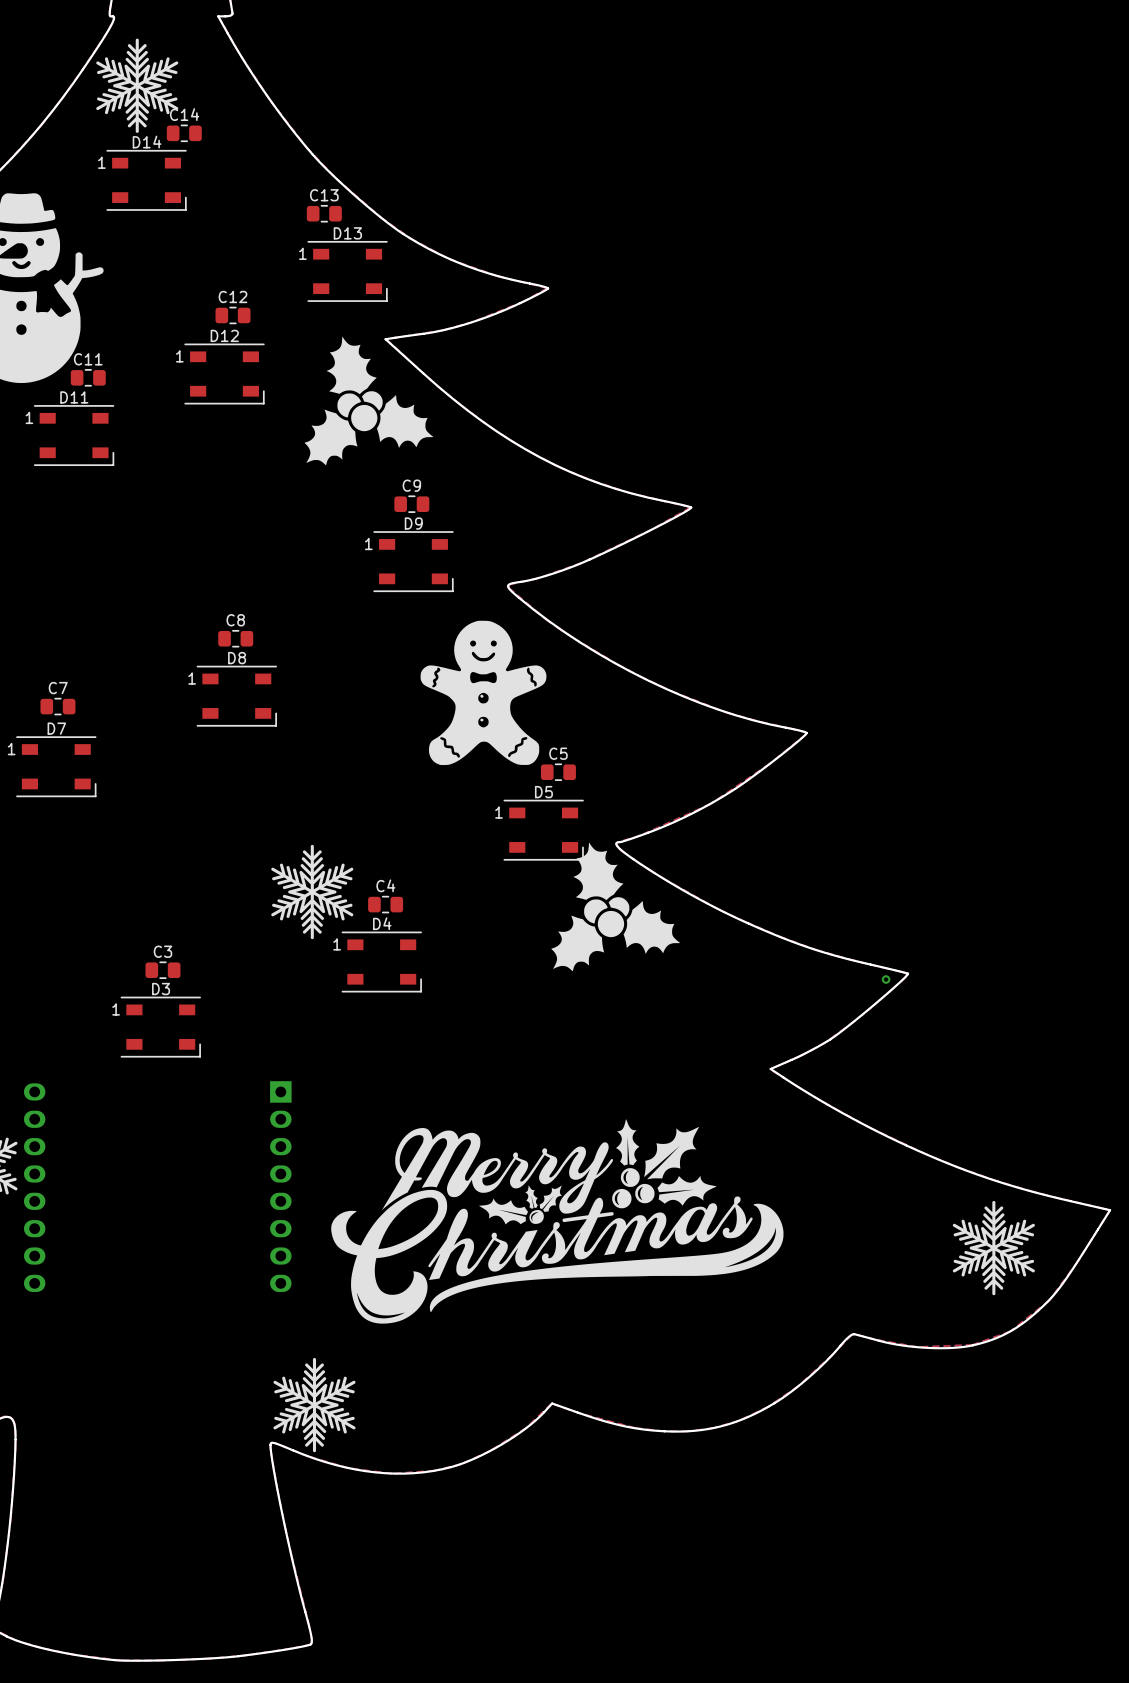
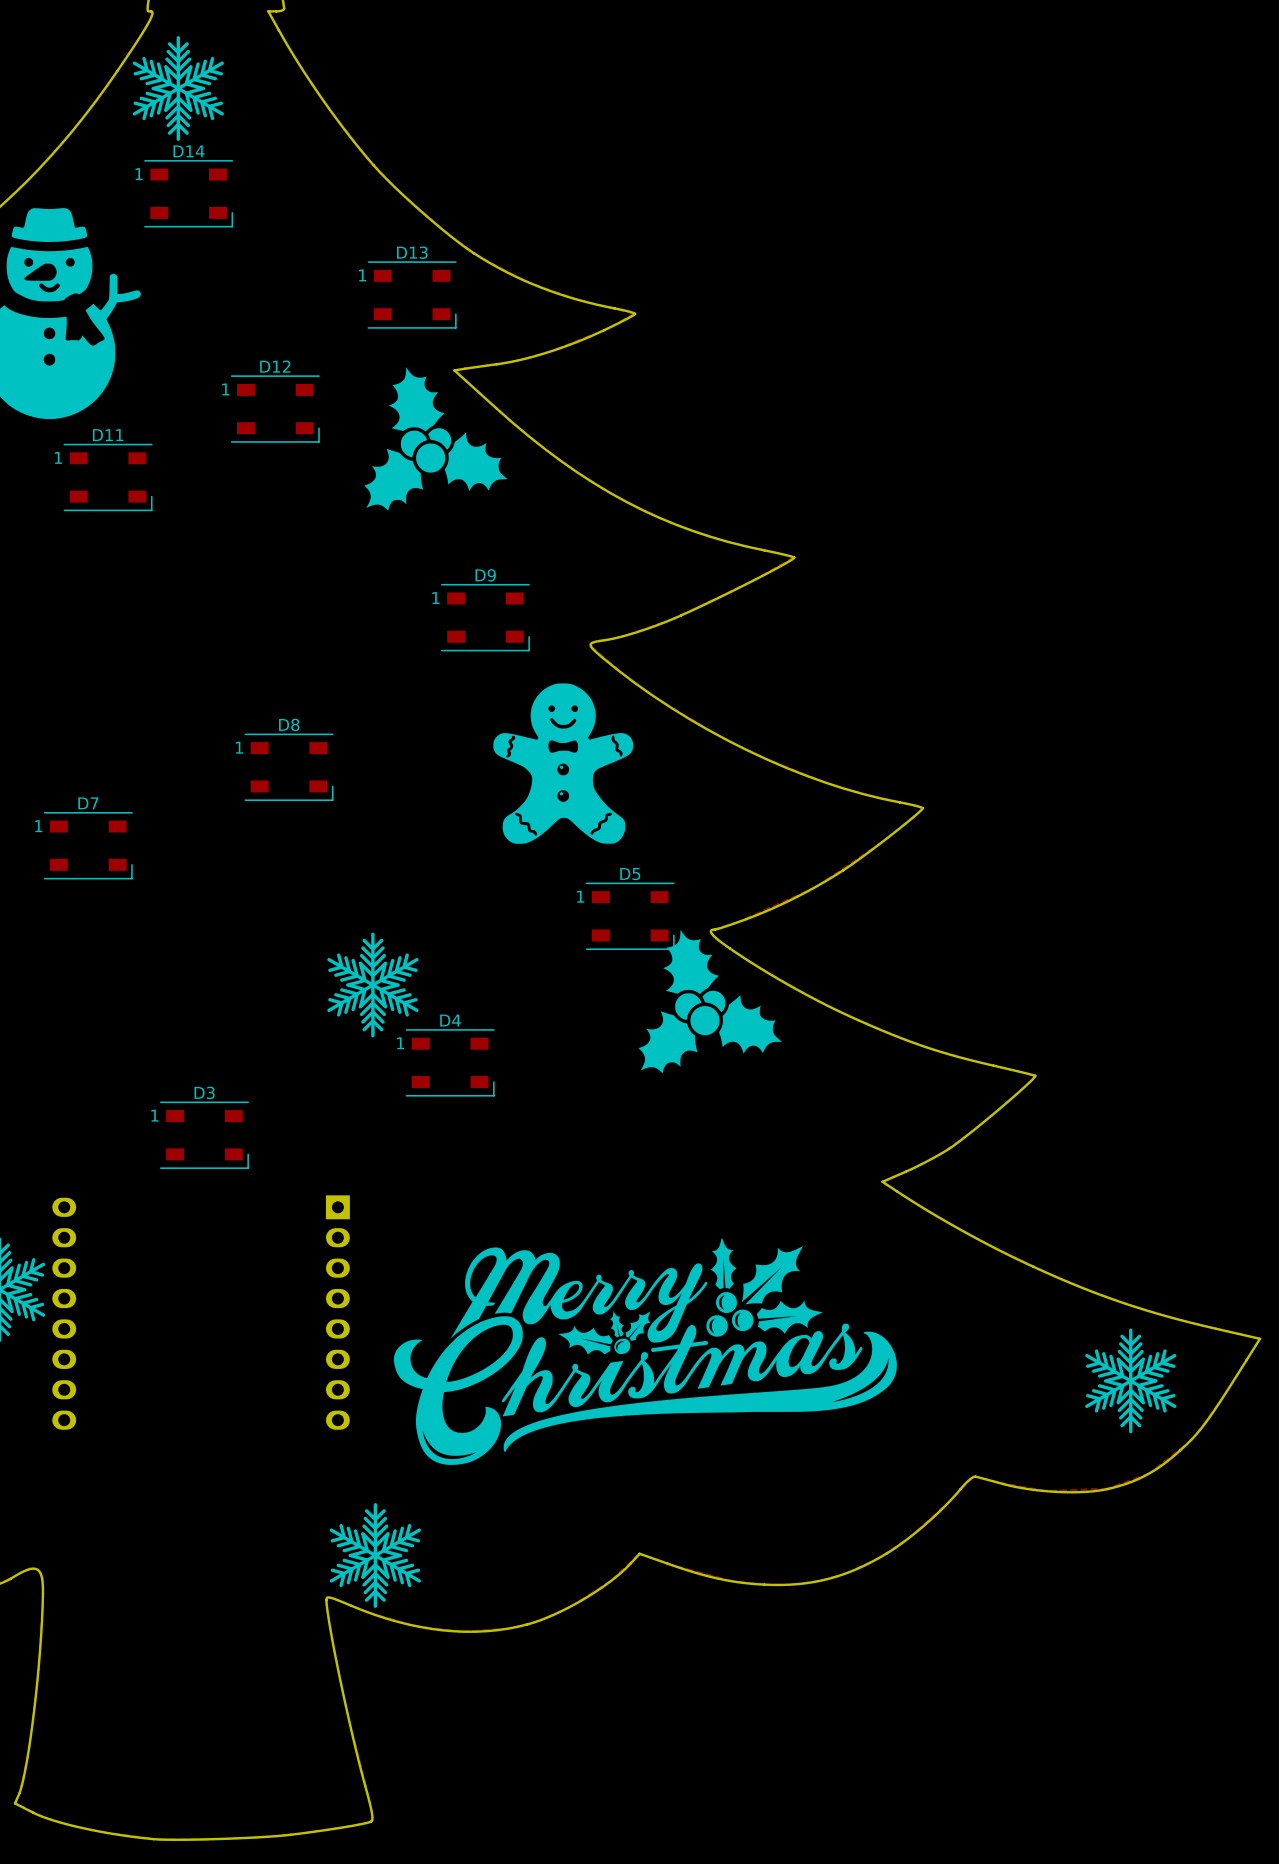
C14: (184, 133) -> none
C13: (324, 213) -> none
C12: (232, 315) -> none
C11: (88, 377) -> none
C9: (411, 504) -> none
C8: (235, 638) -> none
C7: (57, 706) -> none
C5: (558, 772) -> none
C4: (385, 904) -> none
C3: (162, 970) -> none
via: (886, 979) -> none

